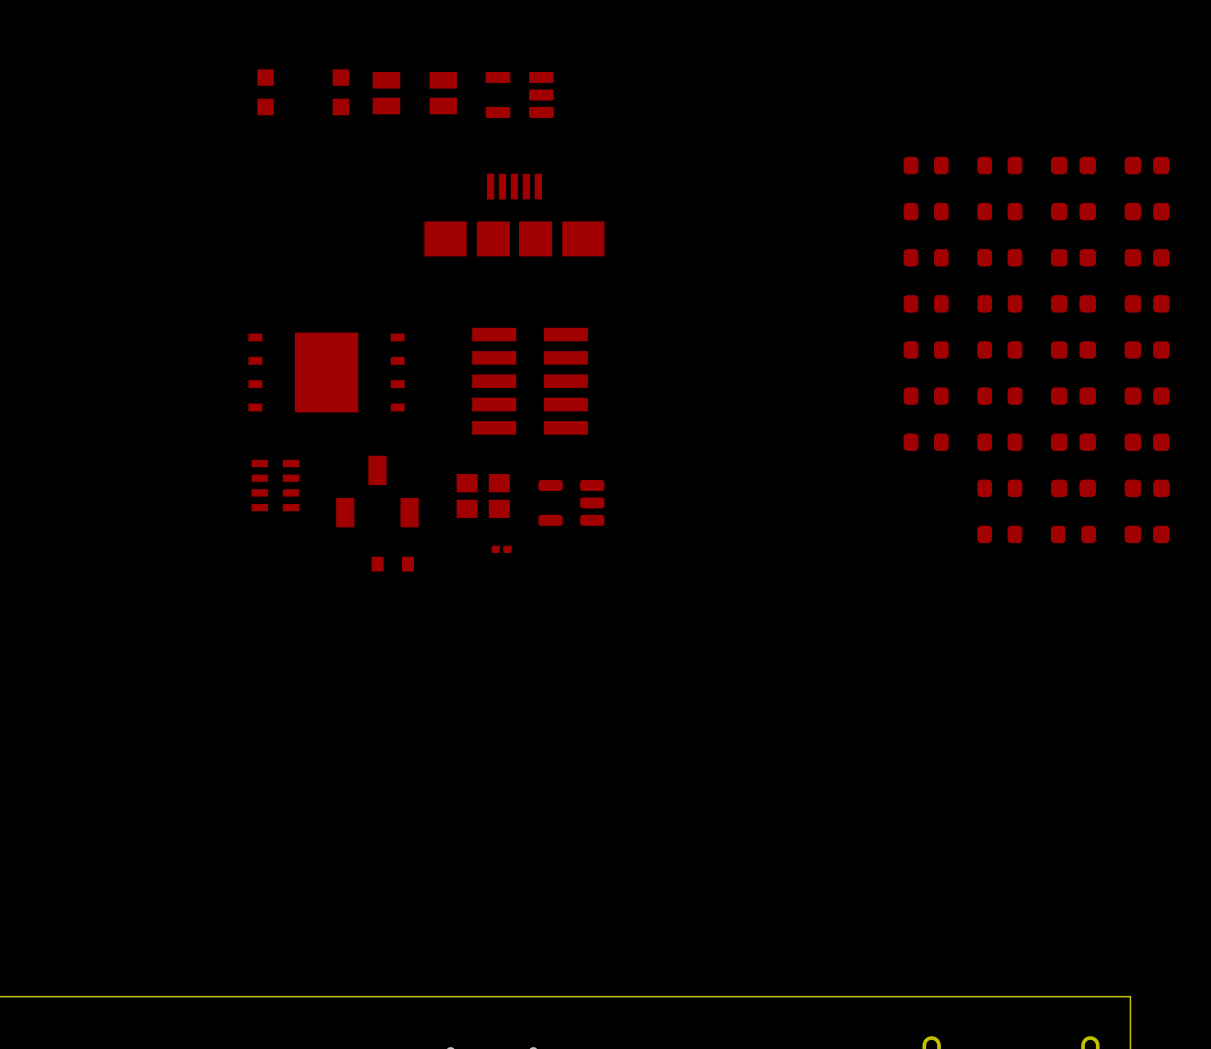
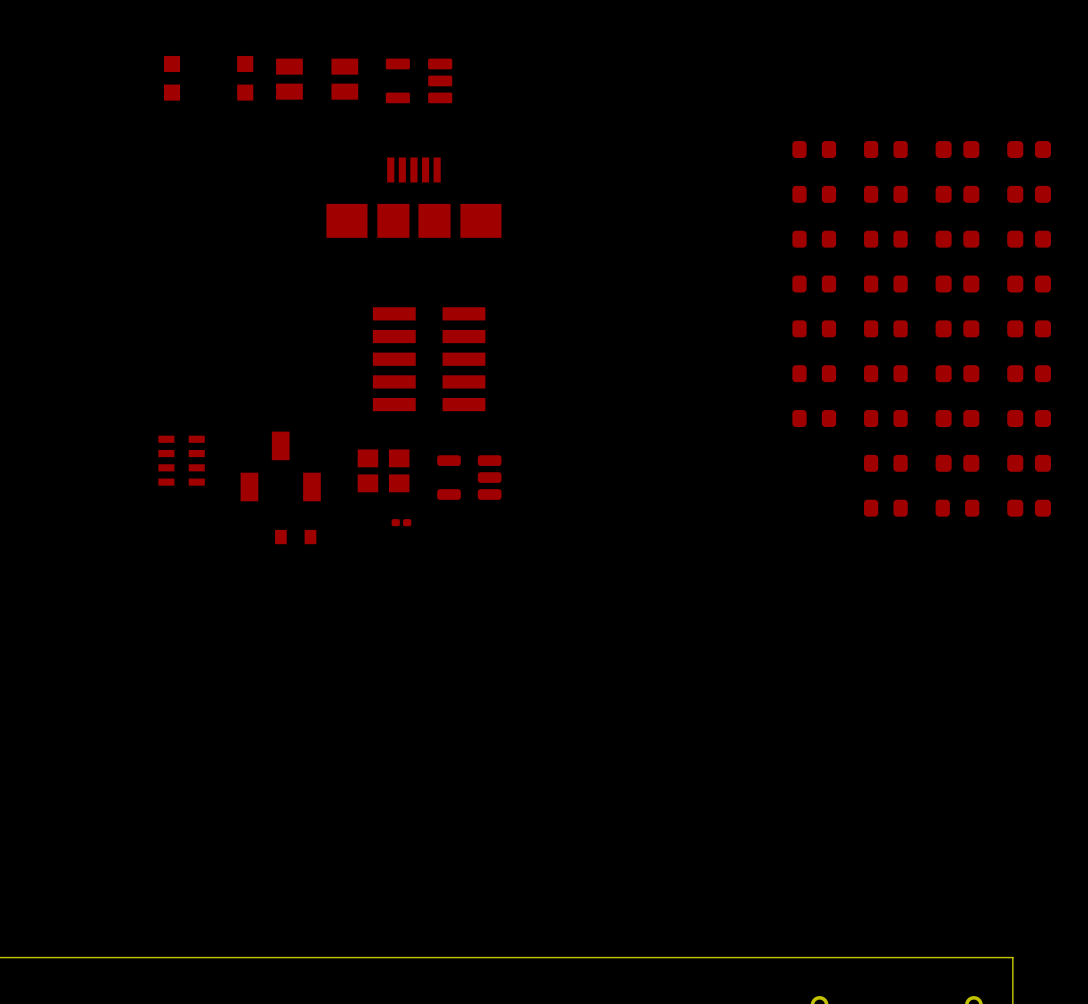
part: (326, 372) -> none

